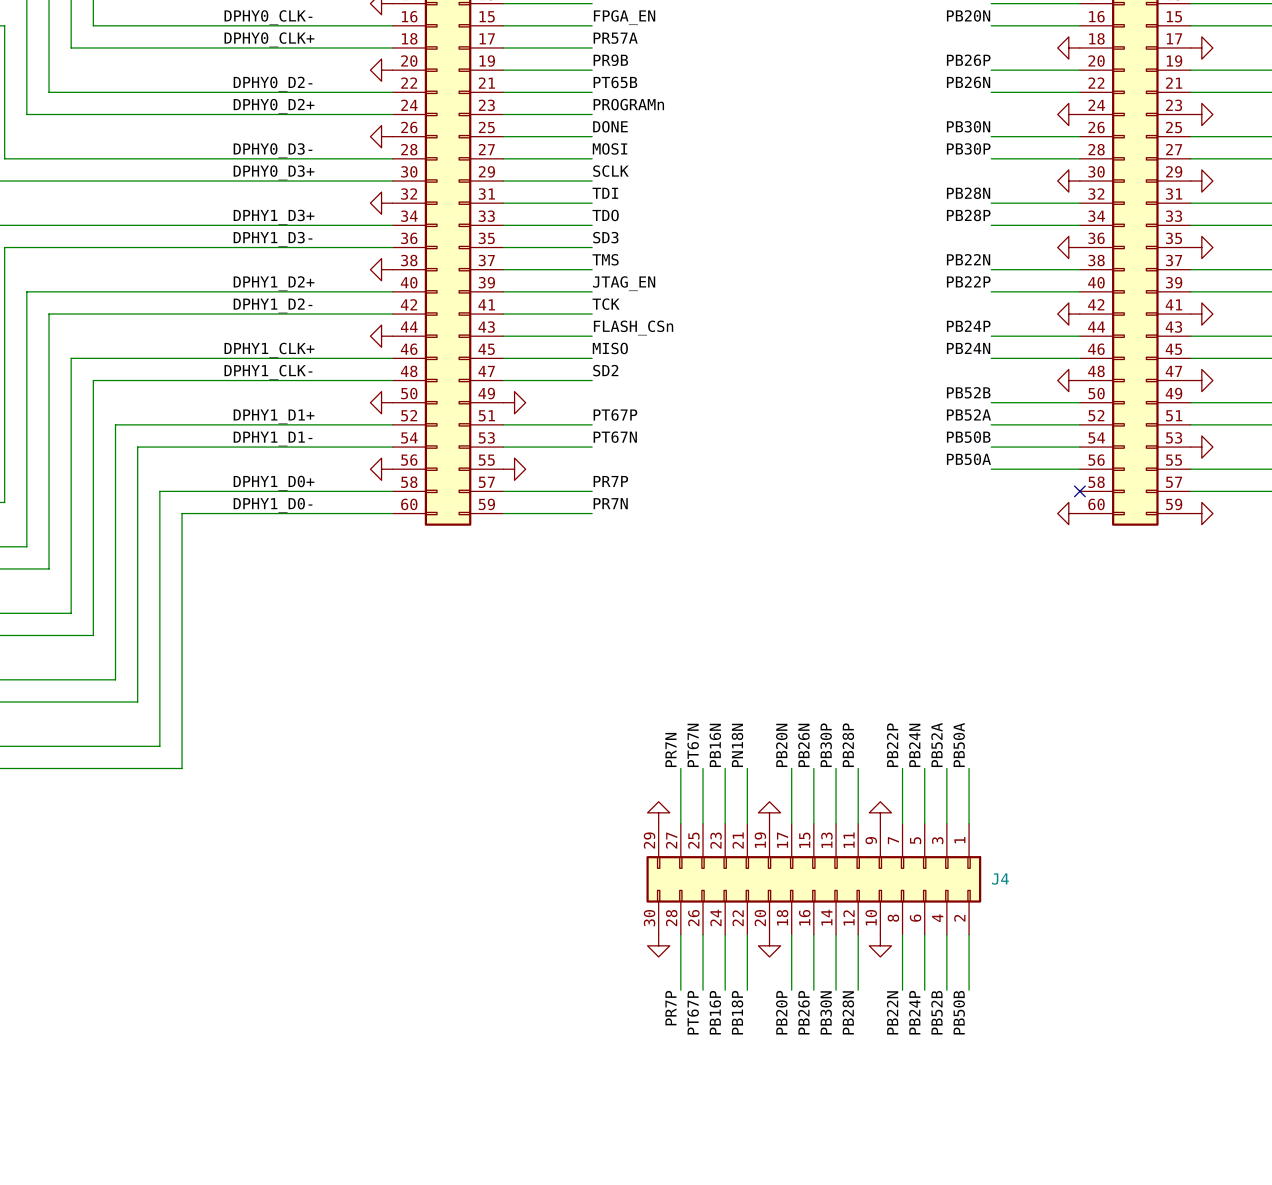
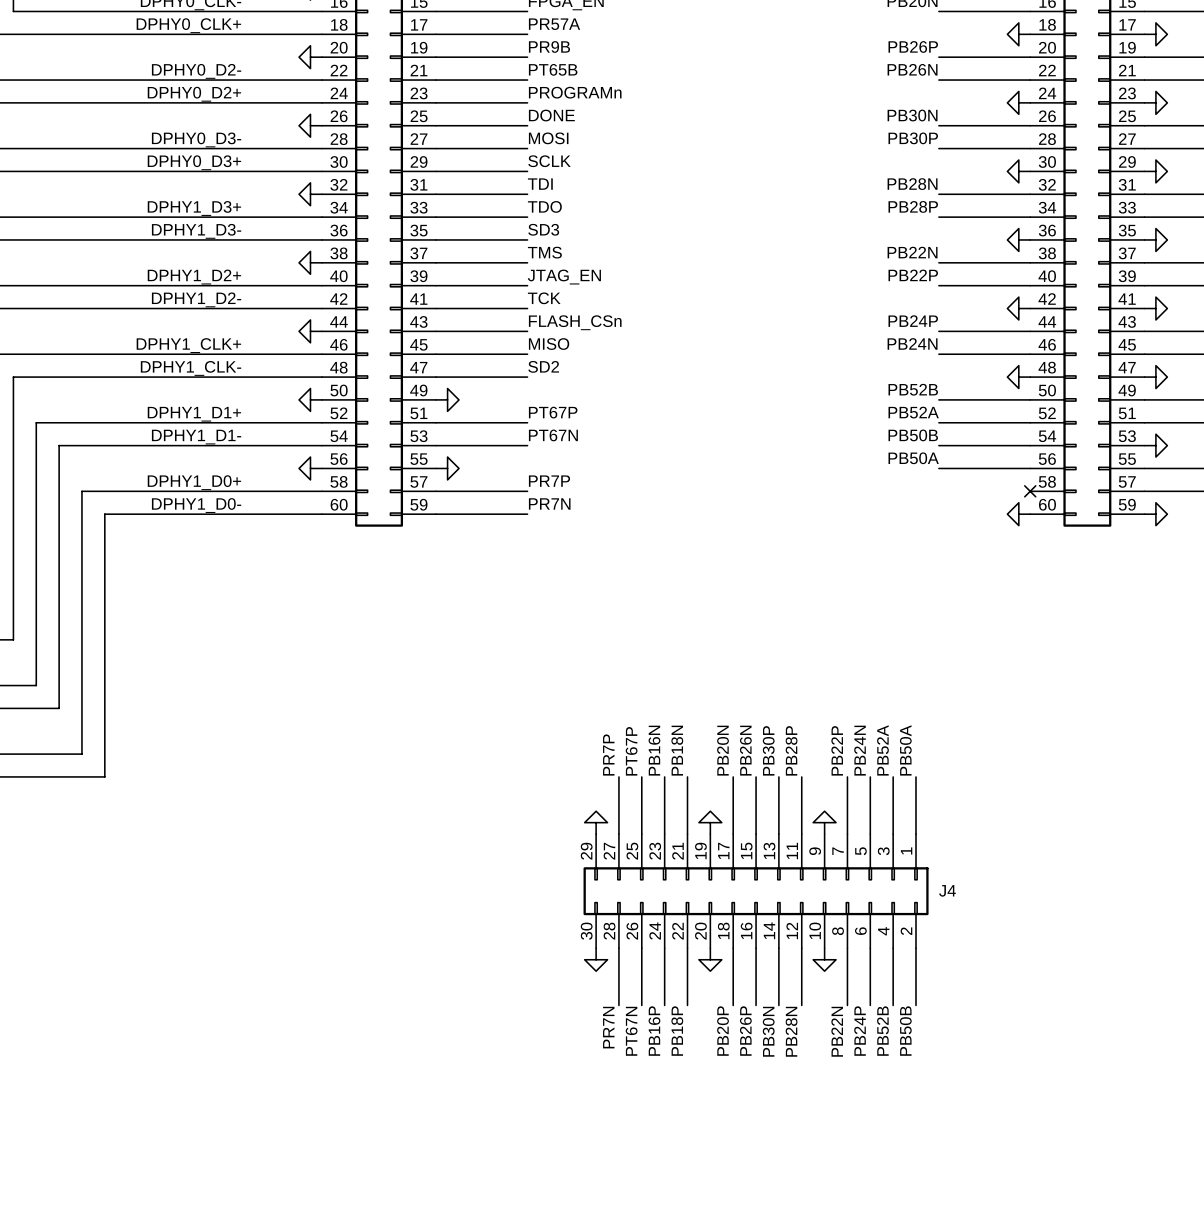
label: PT67N (693, 745) -> PT67P (631, 751)
label: PN18N (737, 745) -> PB18N (677, 750)
label: PR7N (670, 749) -> PR7P (608, 755)
label: PR7P (670, 1008) -> PR7N (608, 1027)
label: PT67P (693, 1012) -> PT67N (631, 1031)

